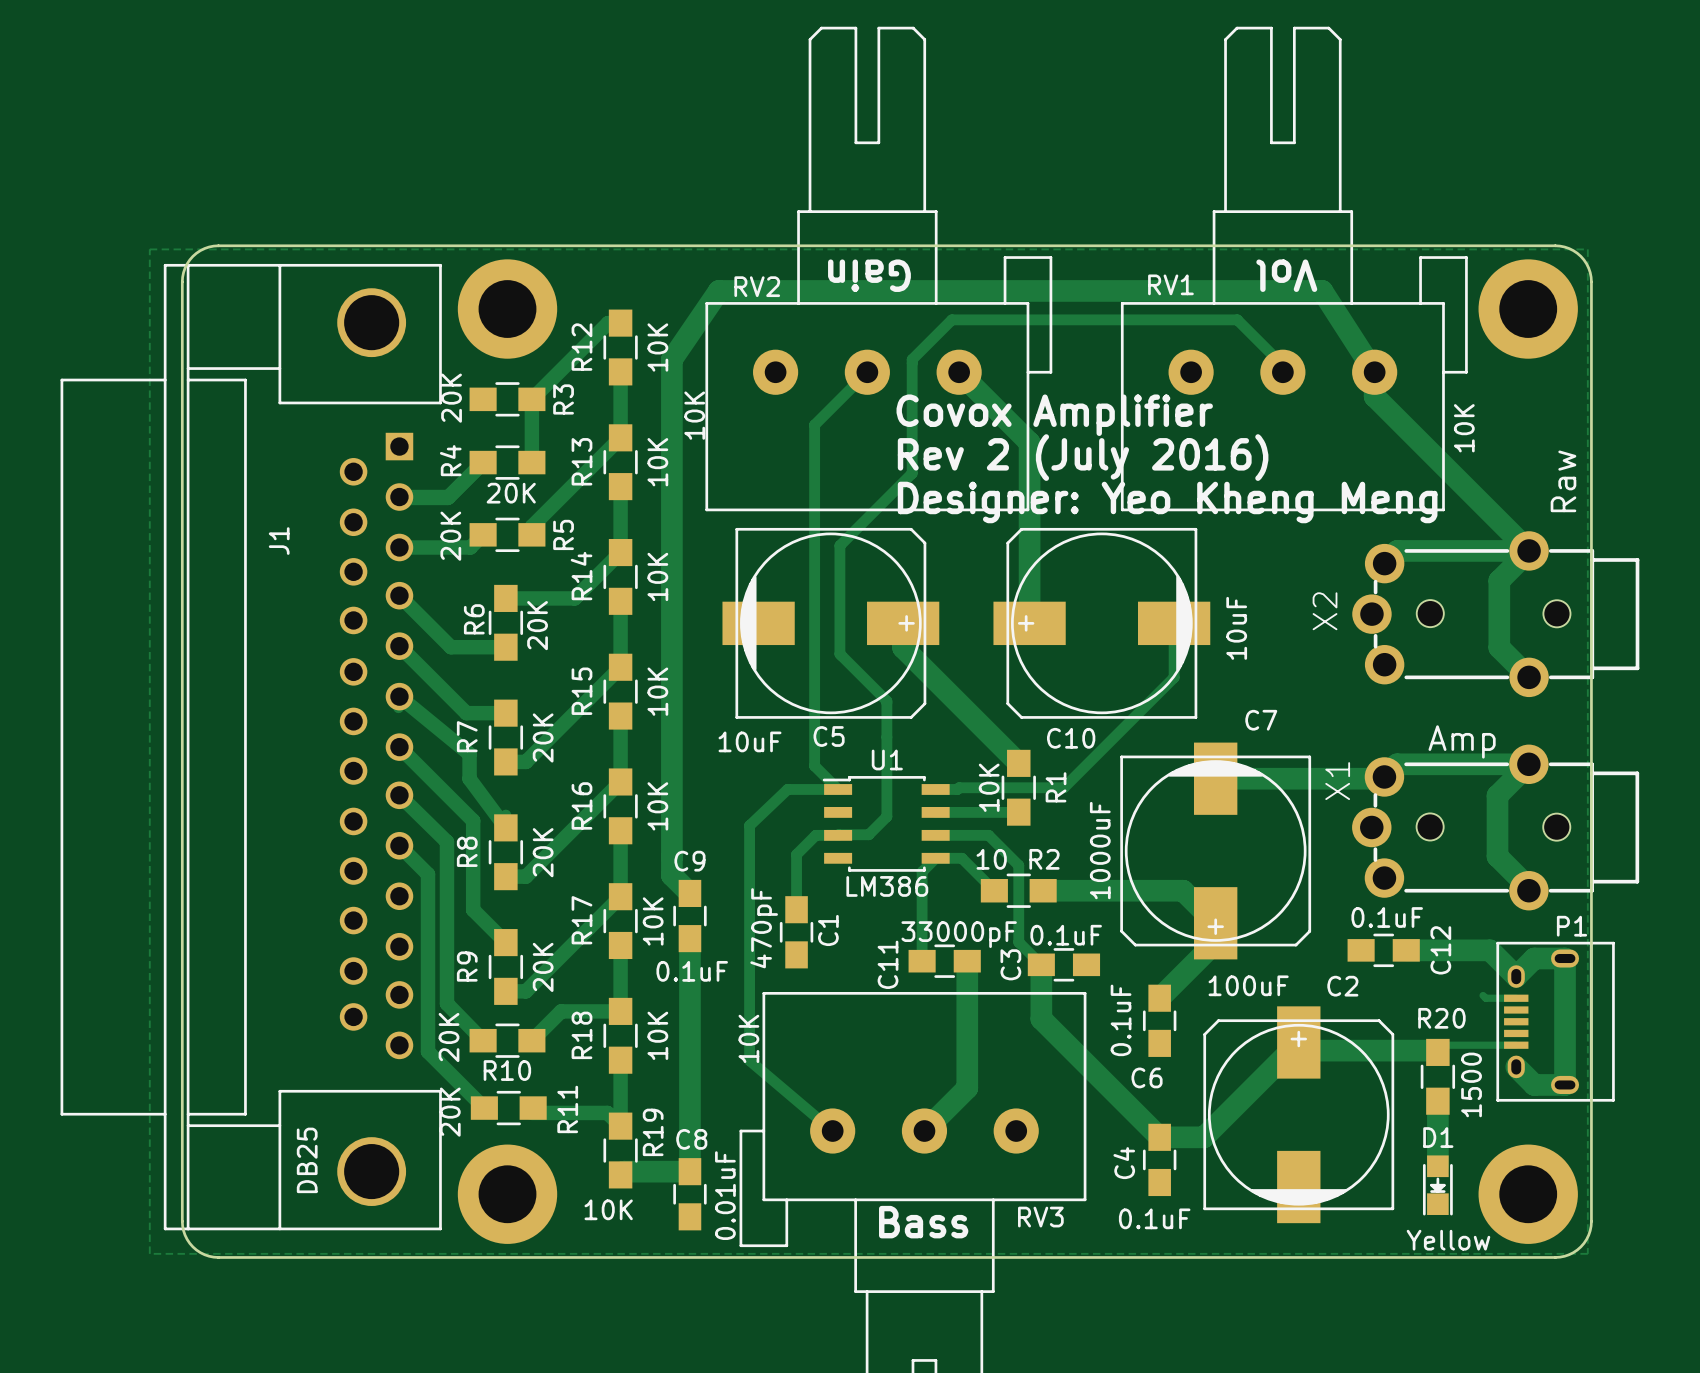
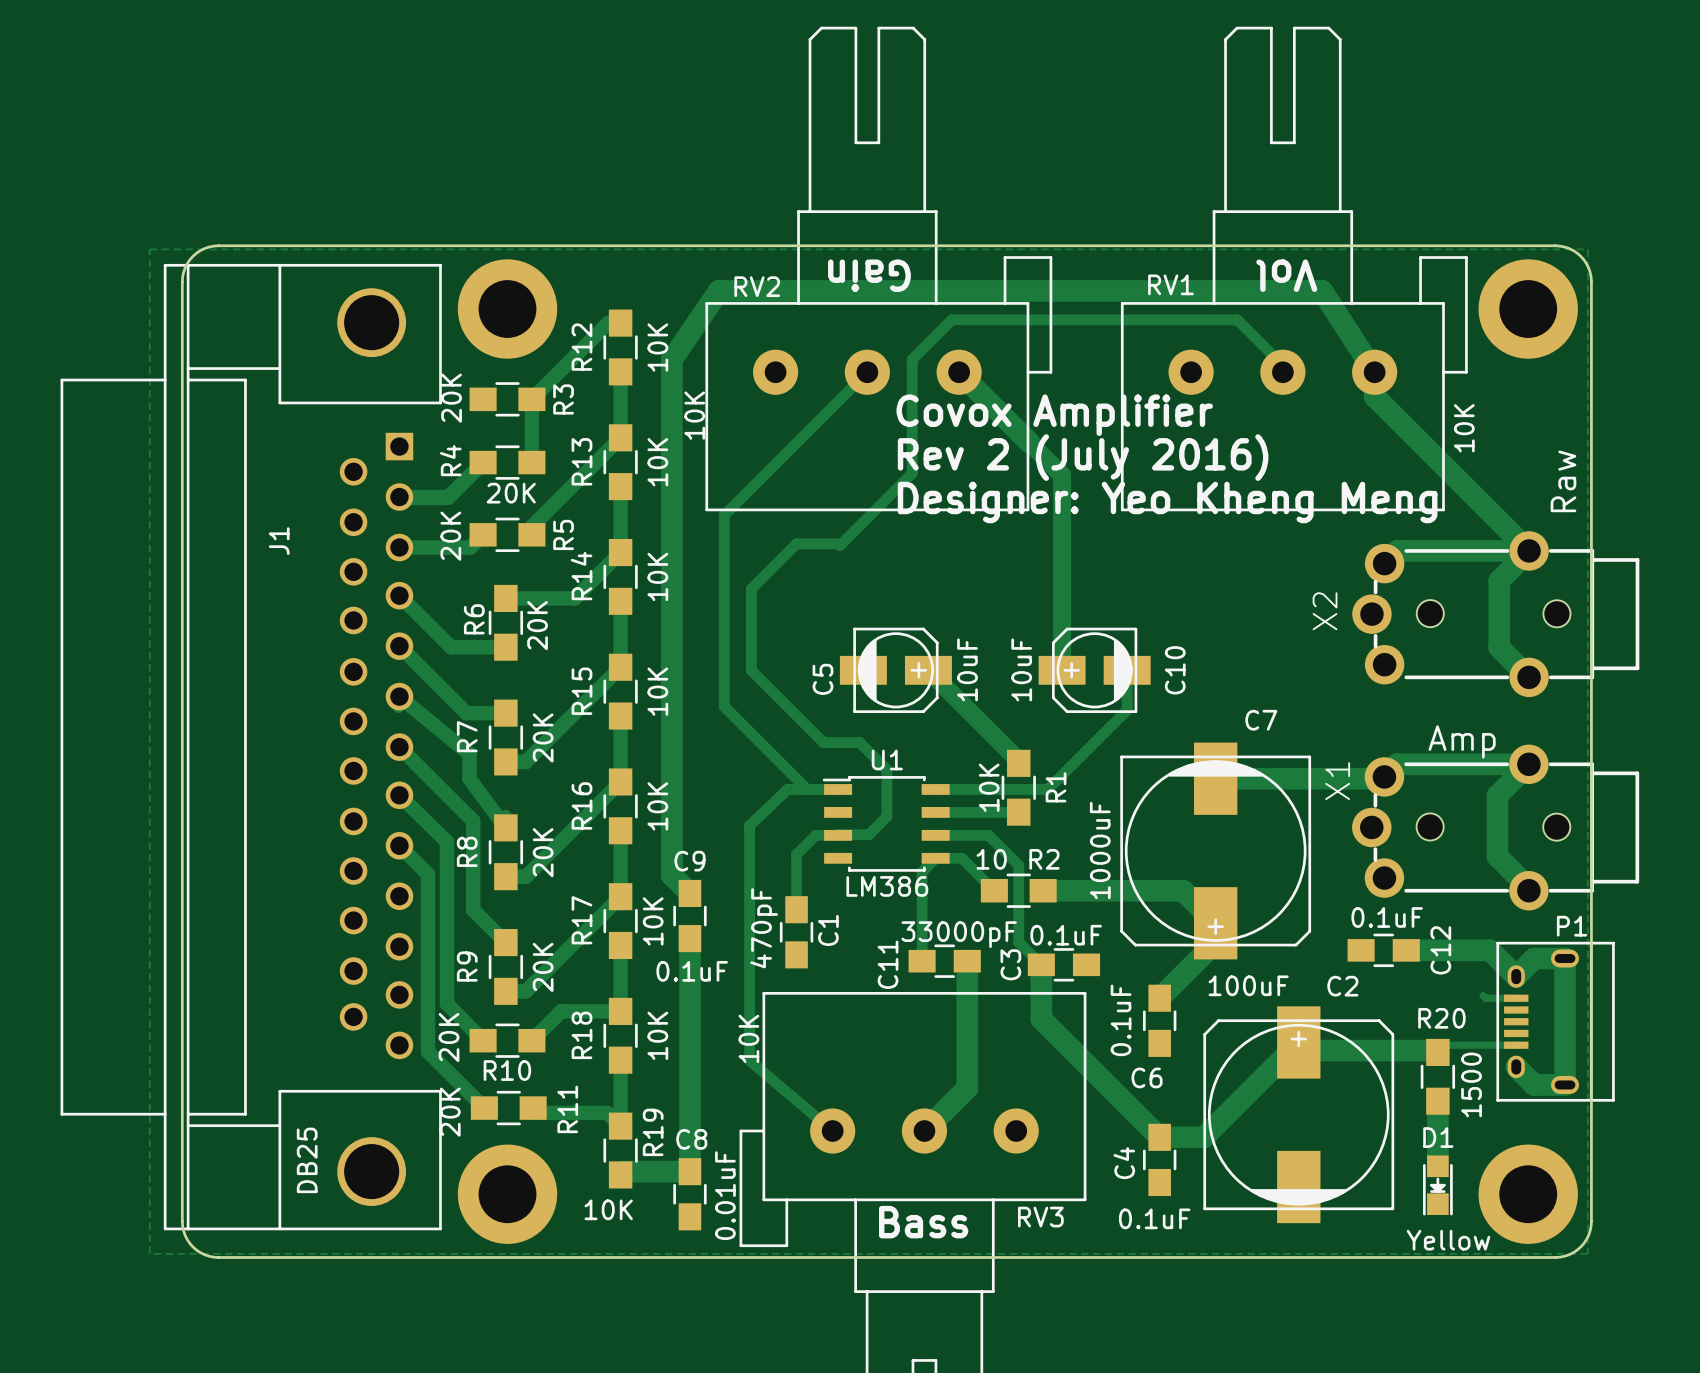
track: (814, 425) (814, 765) (838, 789) -> (814, 425) (724, 515) (724, 706) (807, 789)
track: (1029, 442) (1029, 623) -> (1029, 442) (1062, 475) (1062, 670)
C5 footprint: [722, 527, 940, 719] -> [839, 627, 952, 713]
C10 footprint: [993, 527, 1211, 719] -> [1038, 627, 1151, 713]
track: (839, 545) (839, 654) (886, 701) (886, 769) -> (841, 543) (796, 543) (751, 589) (751, 670) (823, 742) (859, 742) (886, 769)
track: (903, 623) (903, 647) (1018, 763) -> (928, 670) (1018, 760) (1018, 763)
track: (1174, 623) (1174, 677) (1063, 787) (959, 787) (957, 789) -> (1127, 670) (1127, 710) (1047, 789) (957, 789)
C10 value position: 10uF (1236, 628) -> 10uF (1021, 669)
C5 name position: C5 (829, 736) -> C5 (822, 679)
C10 name position: C10 (1071, 738) -> C10 (1175, 670)
C5 value position: 10uF (750, 741) -> 10uF (967, 669)

